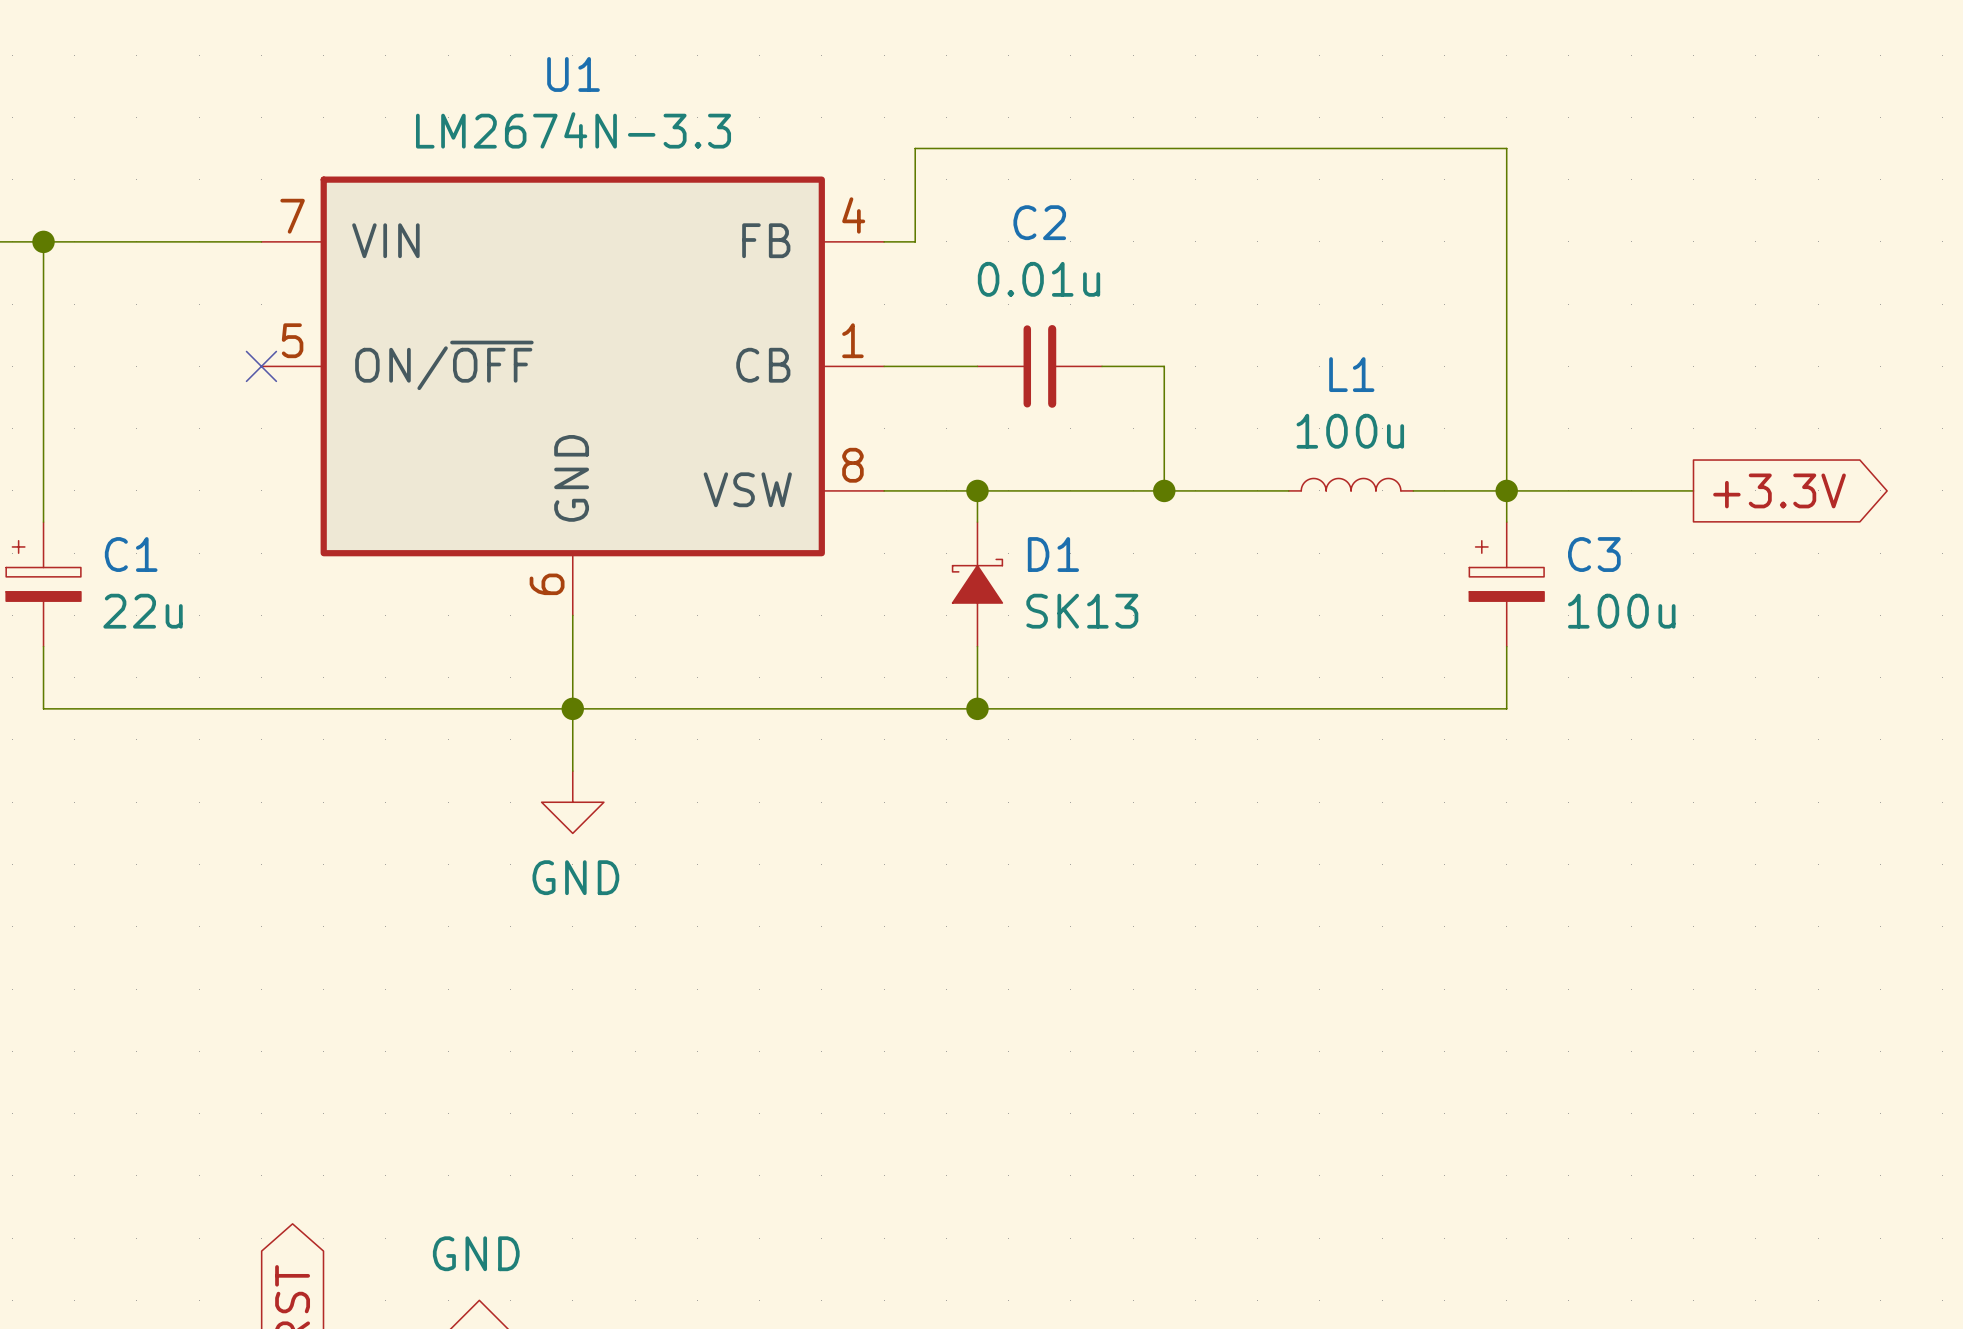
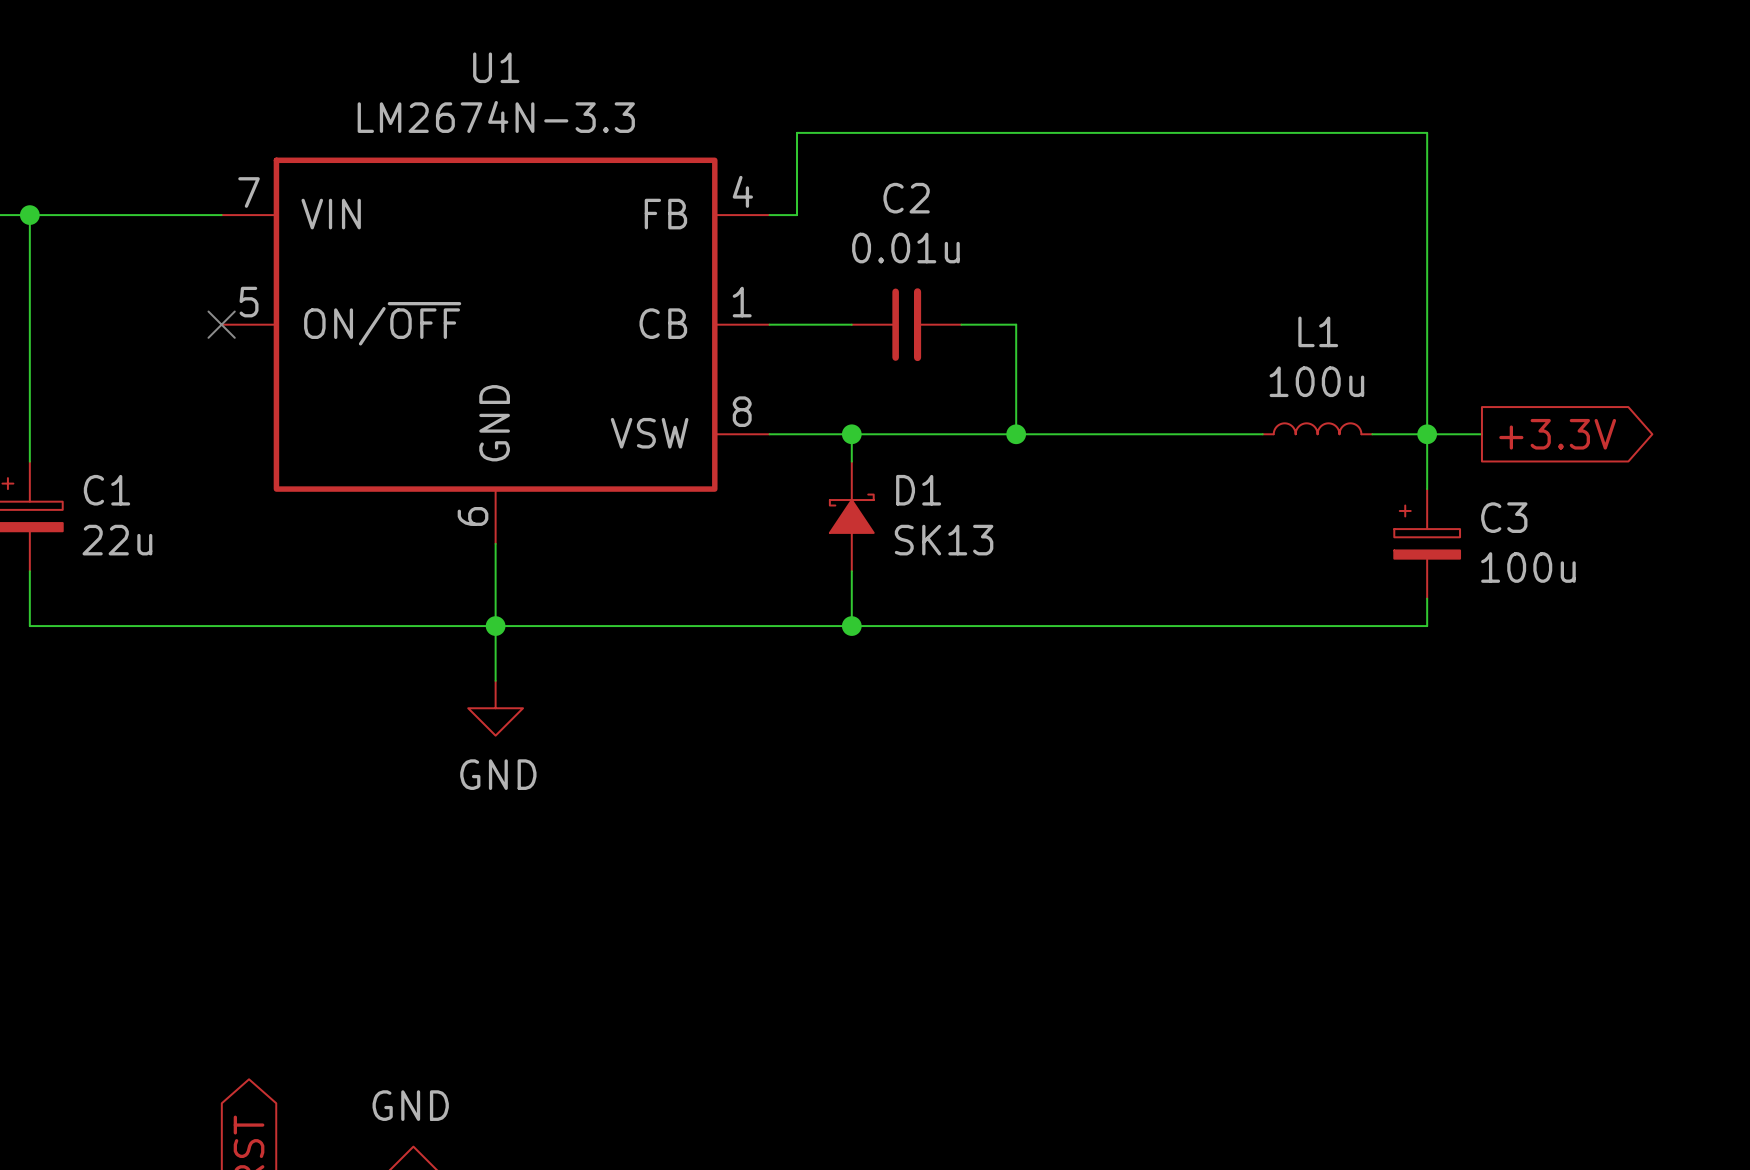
wire: (1506, 148) (1506, 522) -> (1317, 132) (1427, 132) (1427, 489)
L1 position: (1351, 484) -> (1317, 428)
wire: (1444, 490) (1568, 490) -> (1125, 434) (1235, 434)
junction position: (1506, 490) -> (1427, 434)
C3 position: (1506, 584) -> (1427, 543)
wire: (1506, 646) (1506, 708) -> (1427, 598) (1427, 626) (1317, 626)

